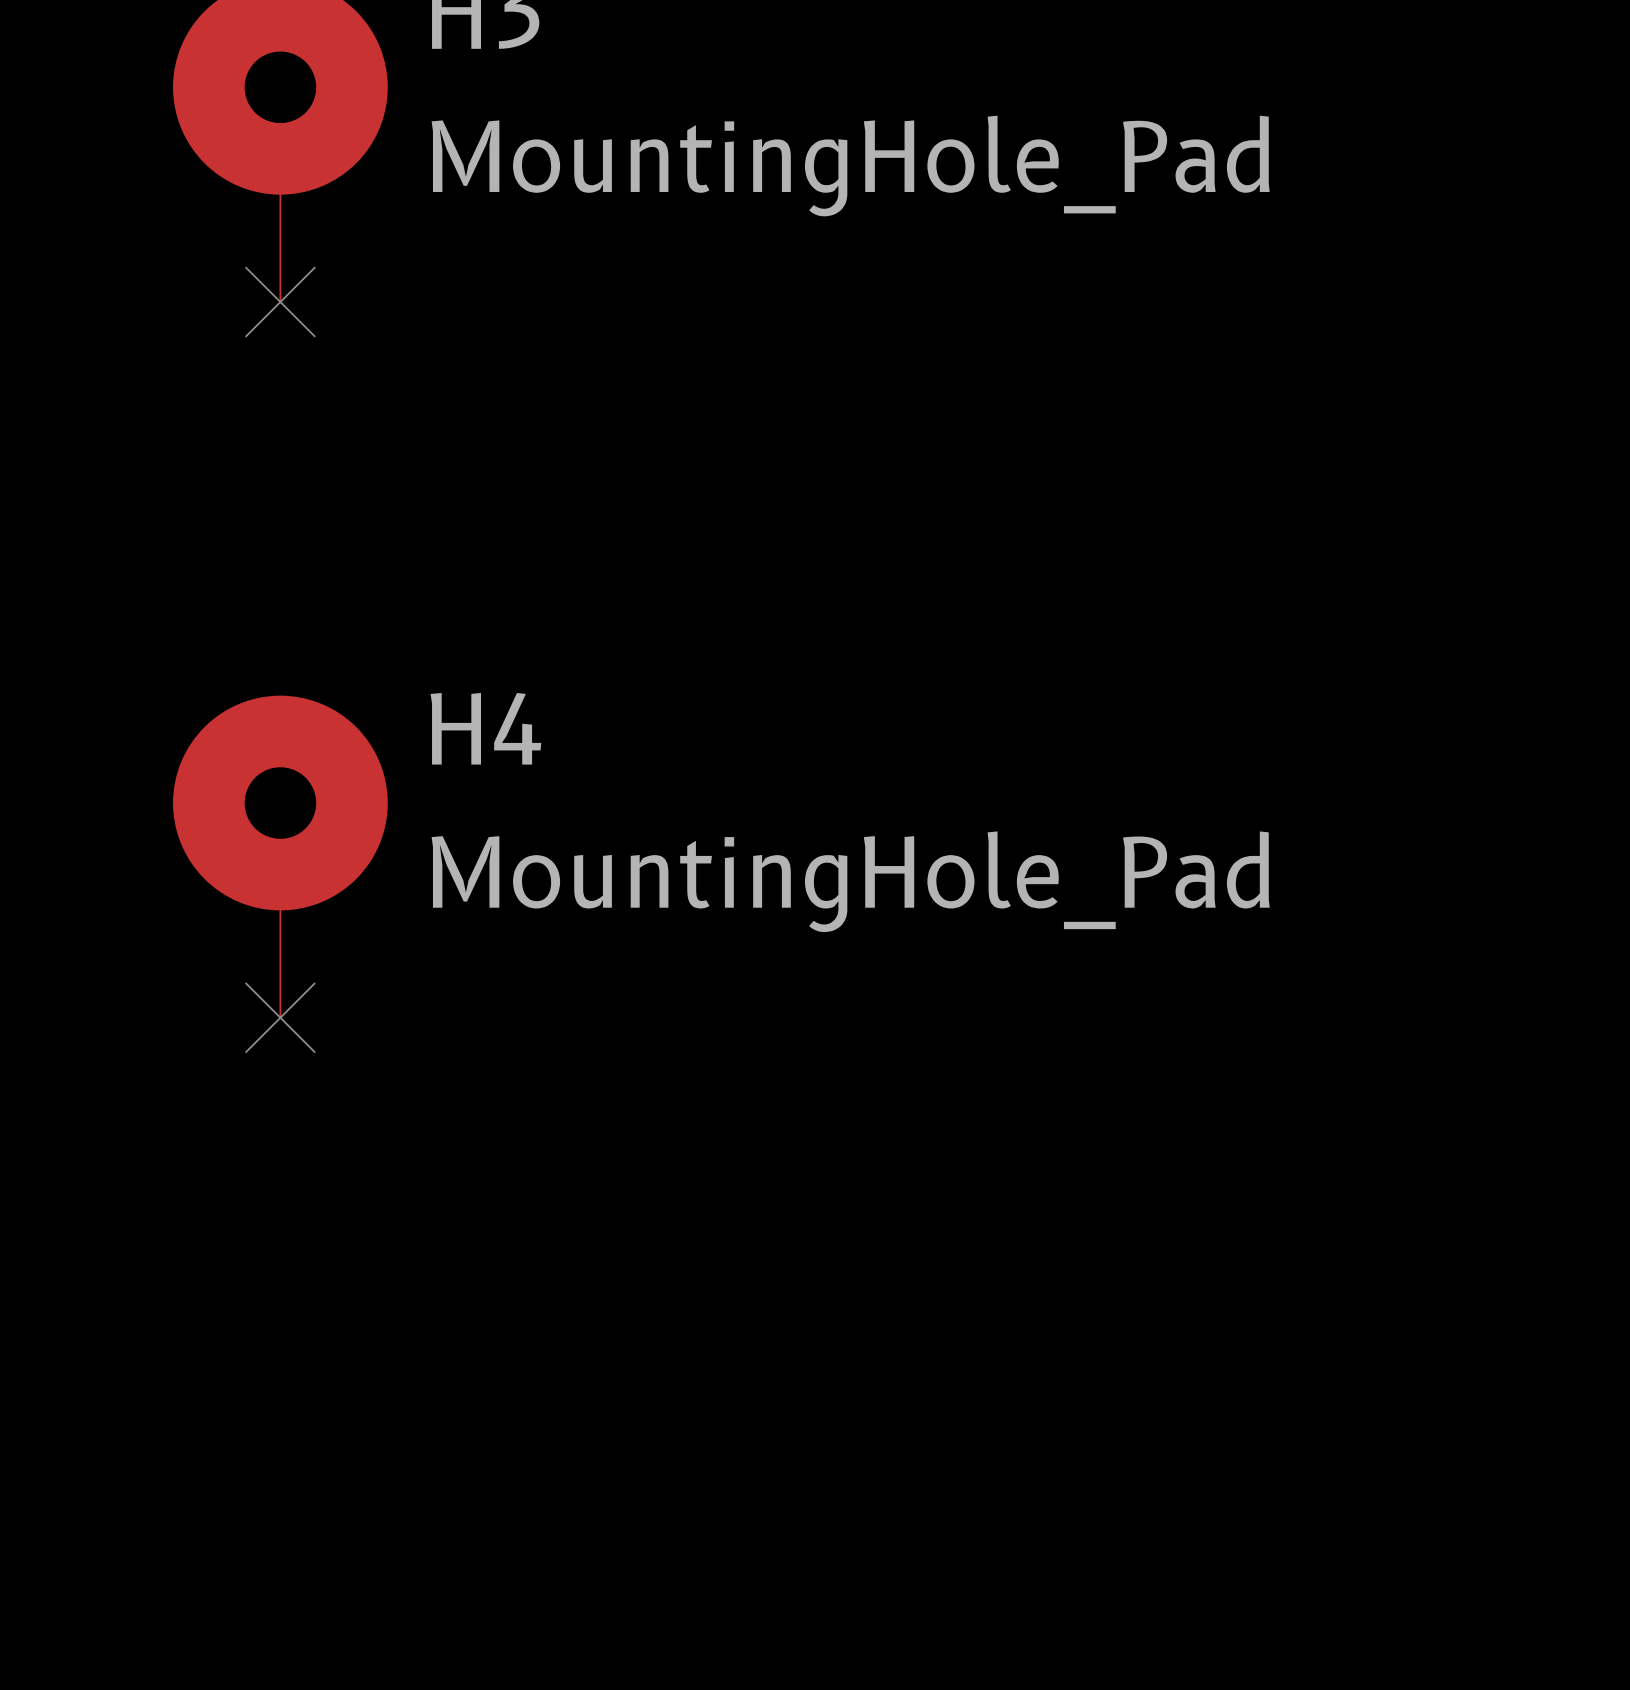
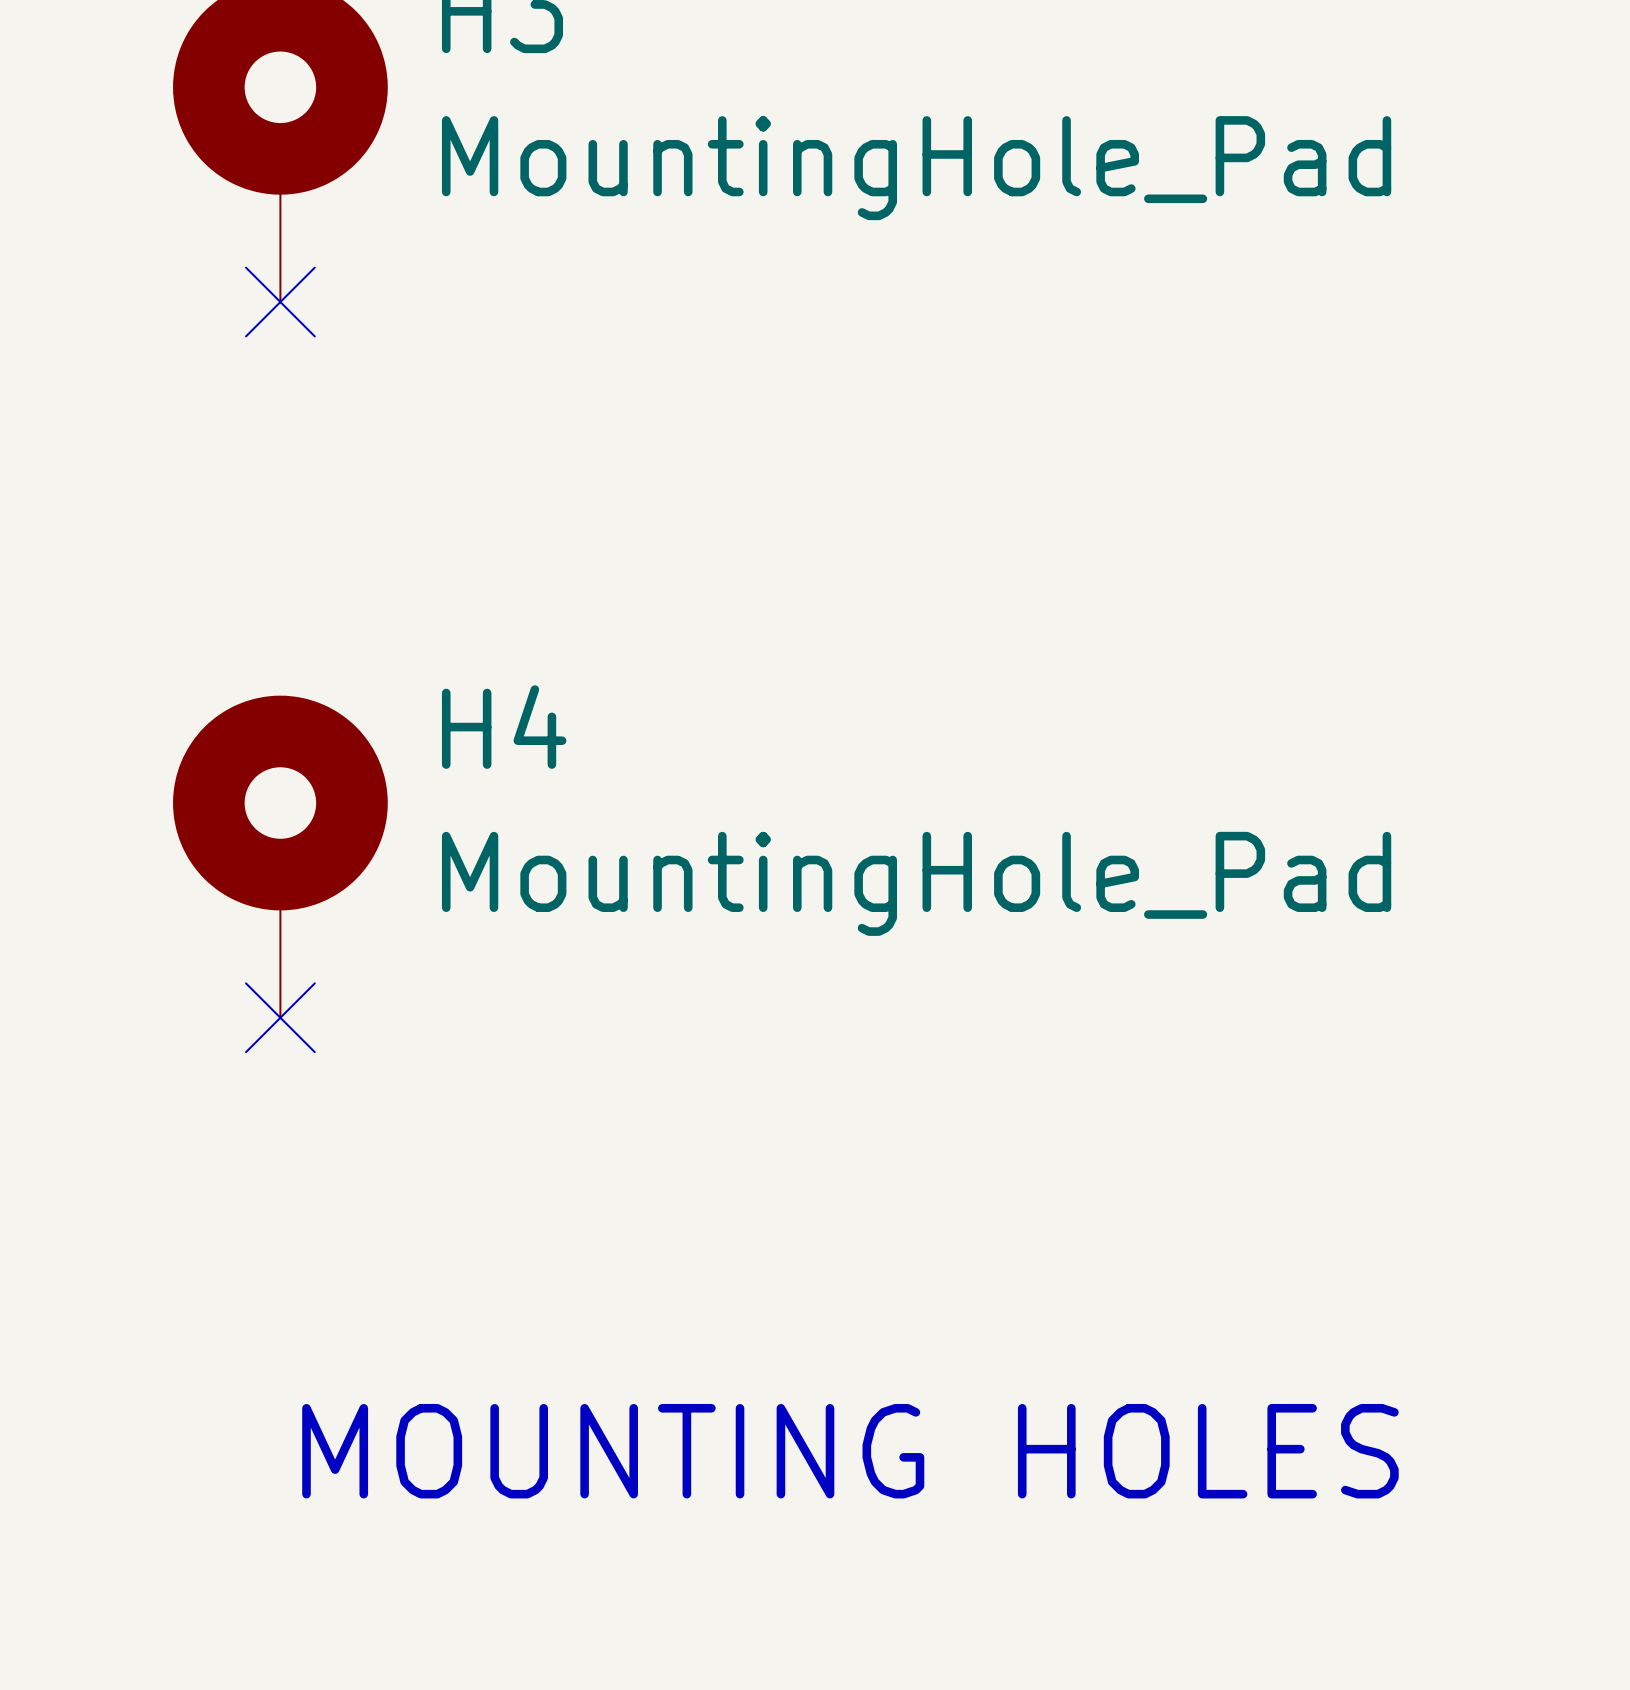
text: none -> MOUNTING HOLES (850, 1451)

